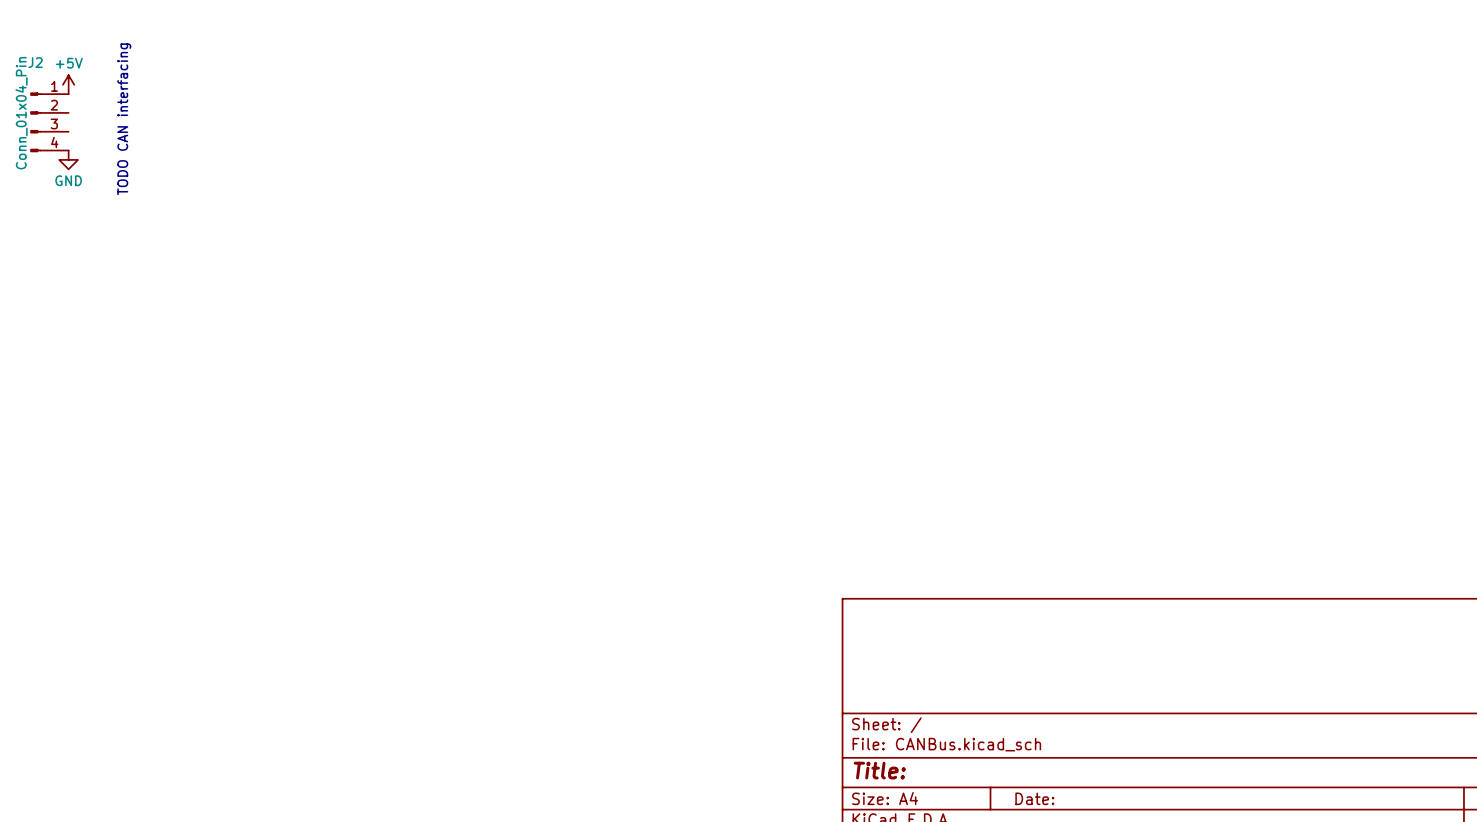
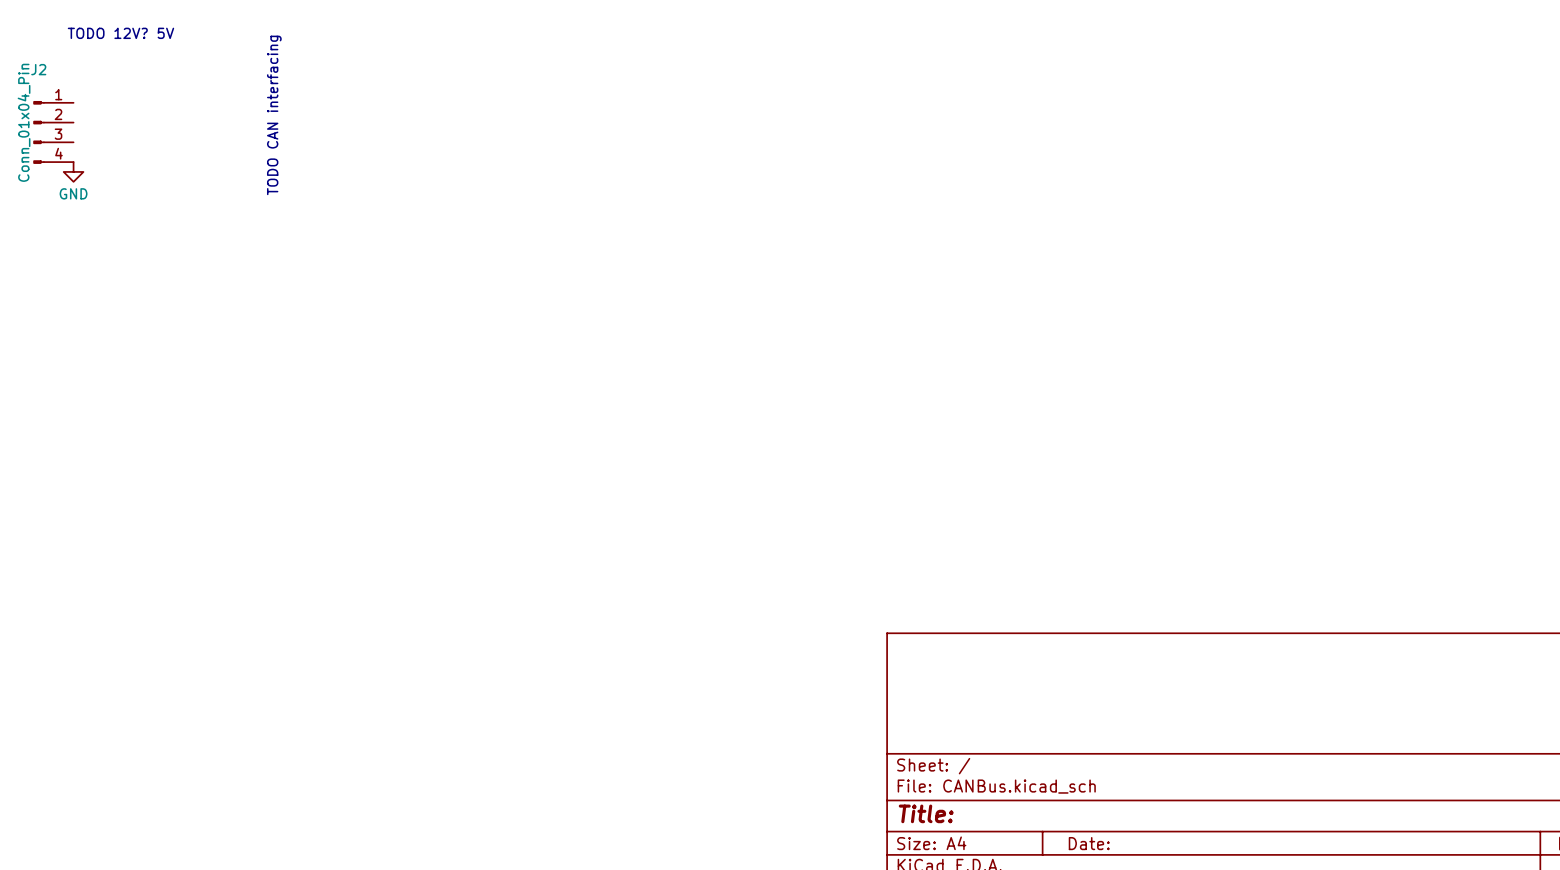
text: none -> TODO 12V? 5V (120, 33)
power symbol: +5V (68, 84) -> none
text position: TODO CAN interfacing (124, 119) -> TODO CAN interfacing (274, 115)

